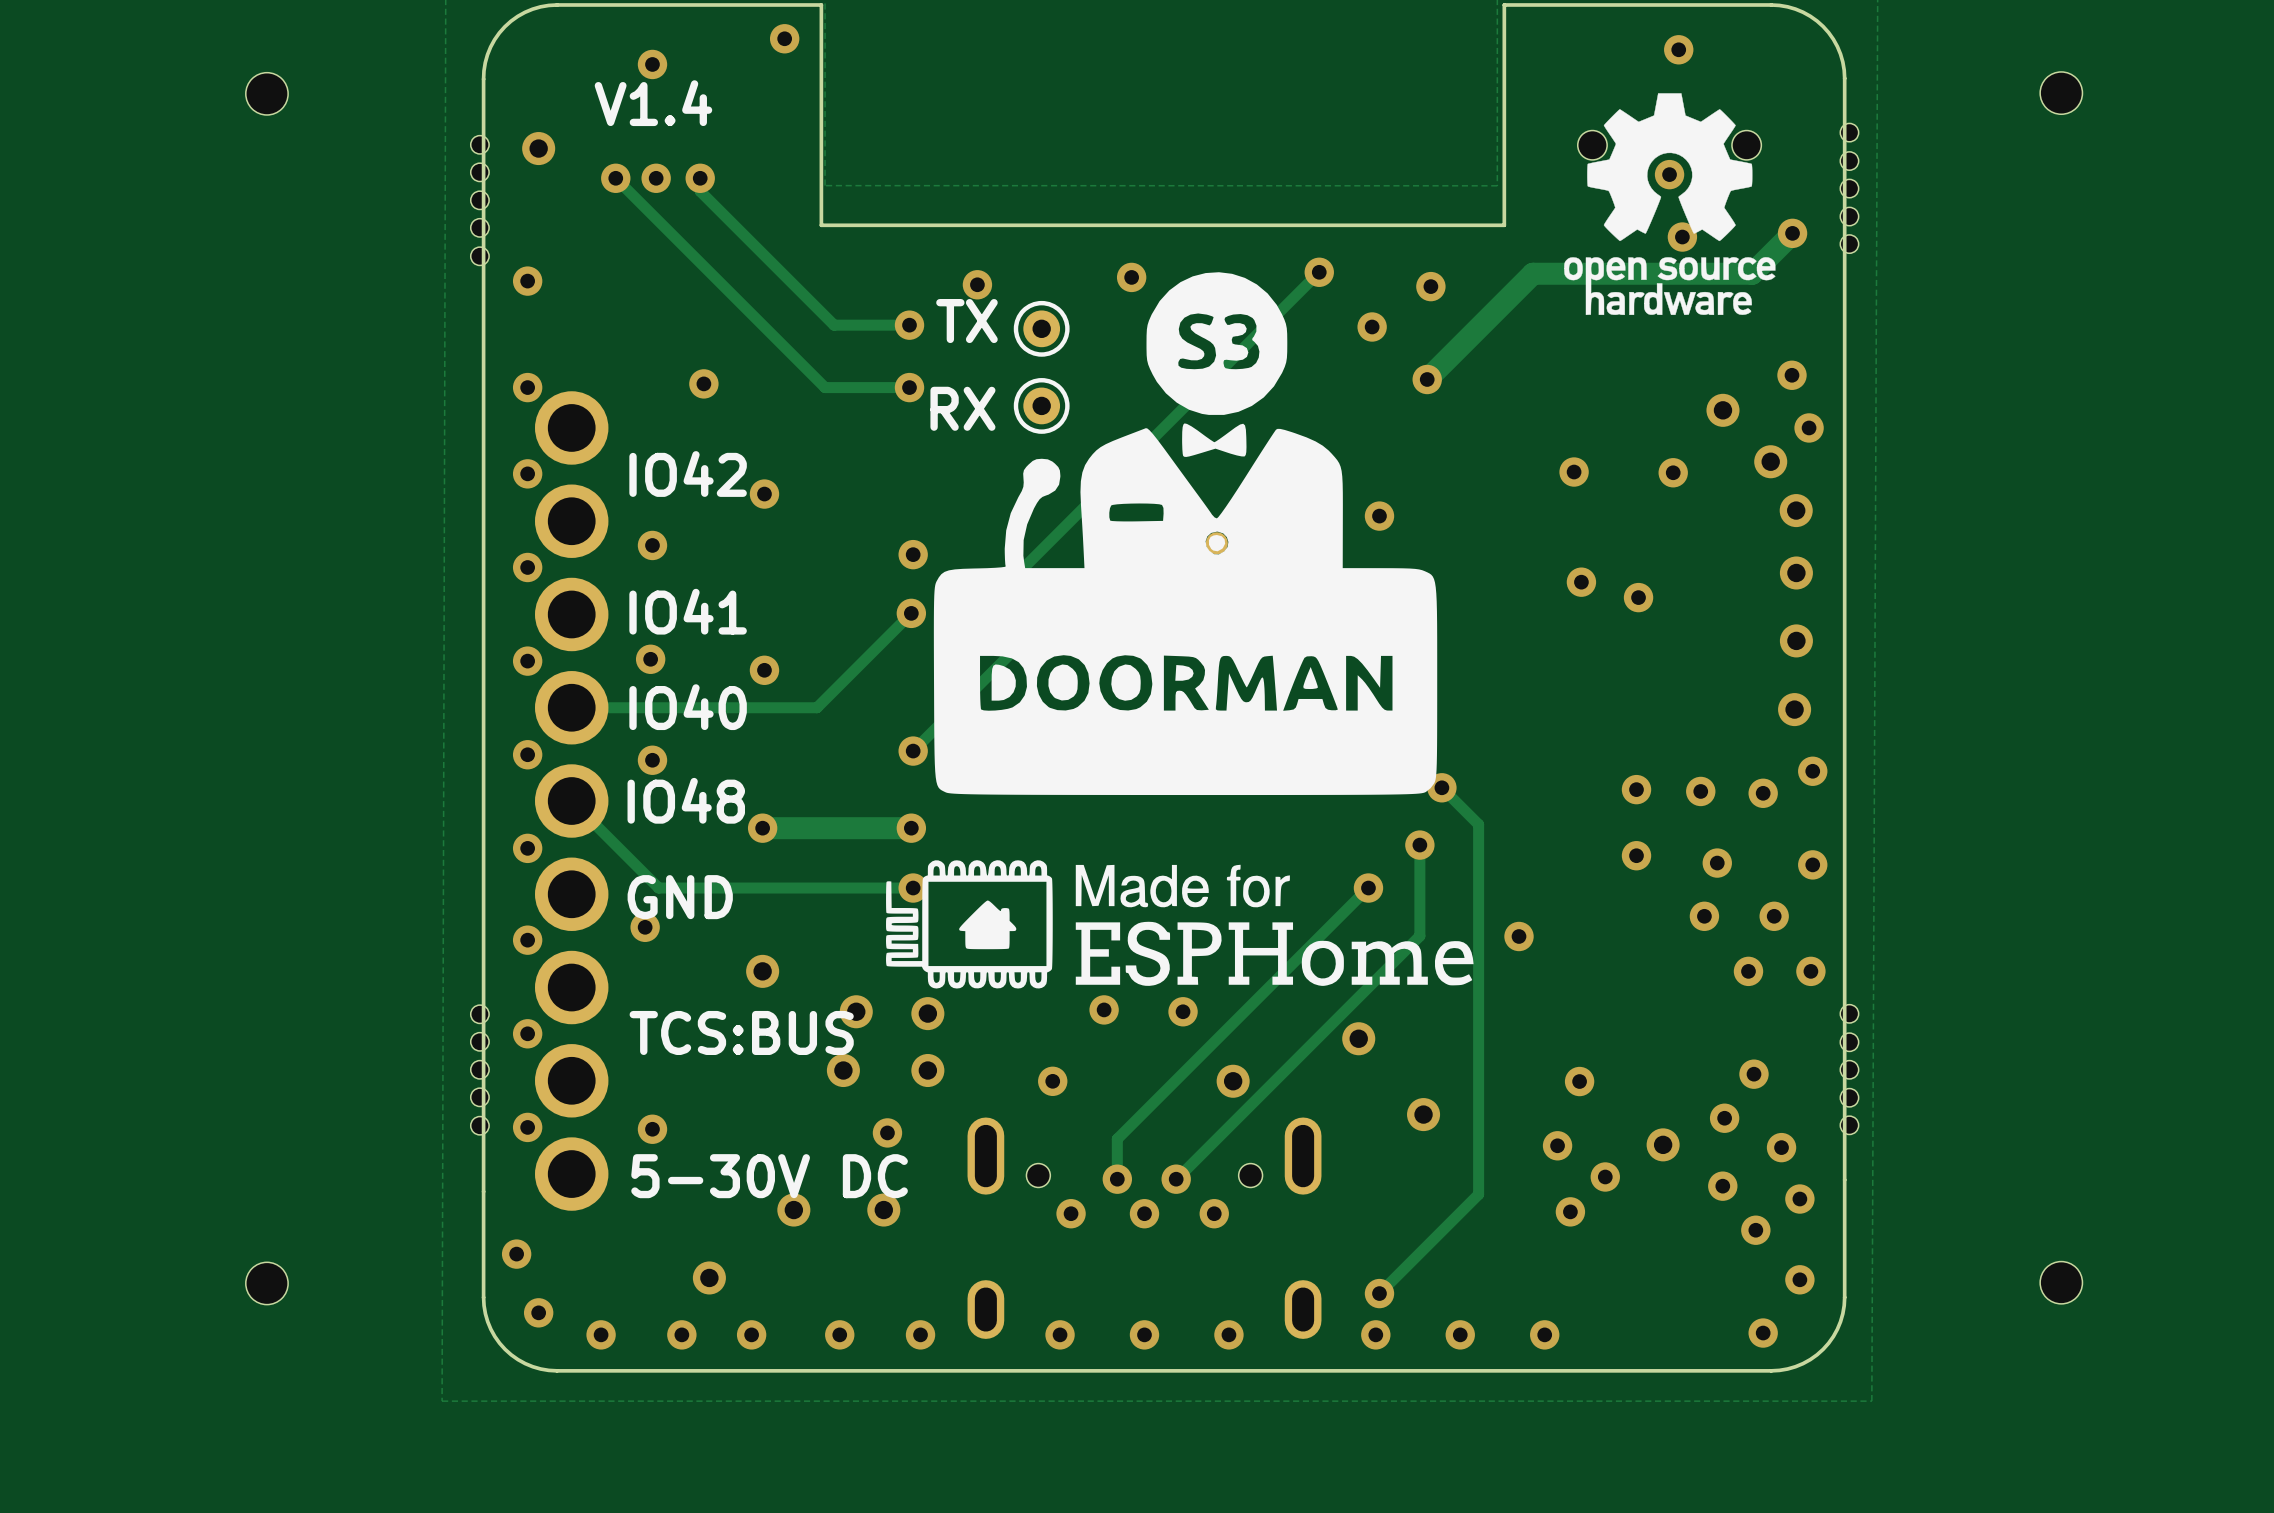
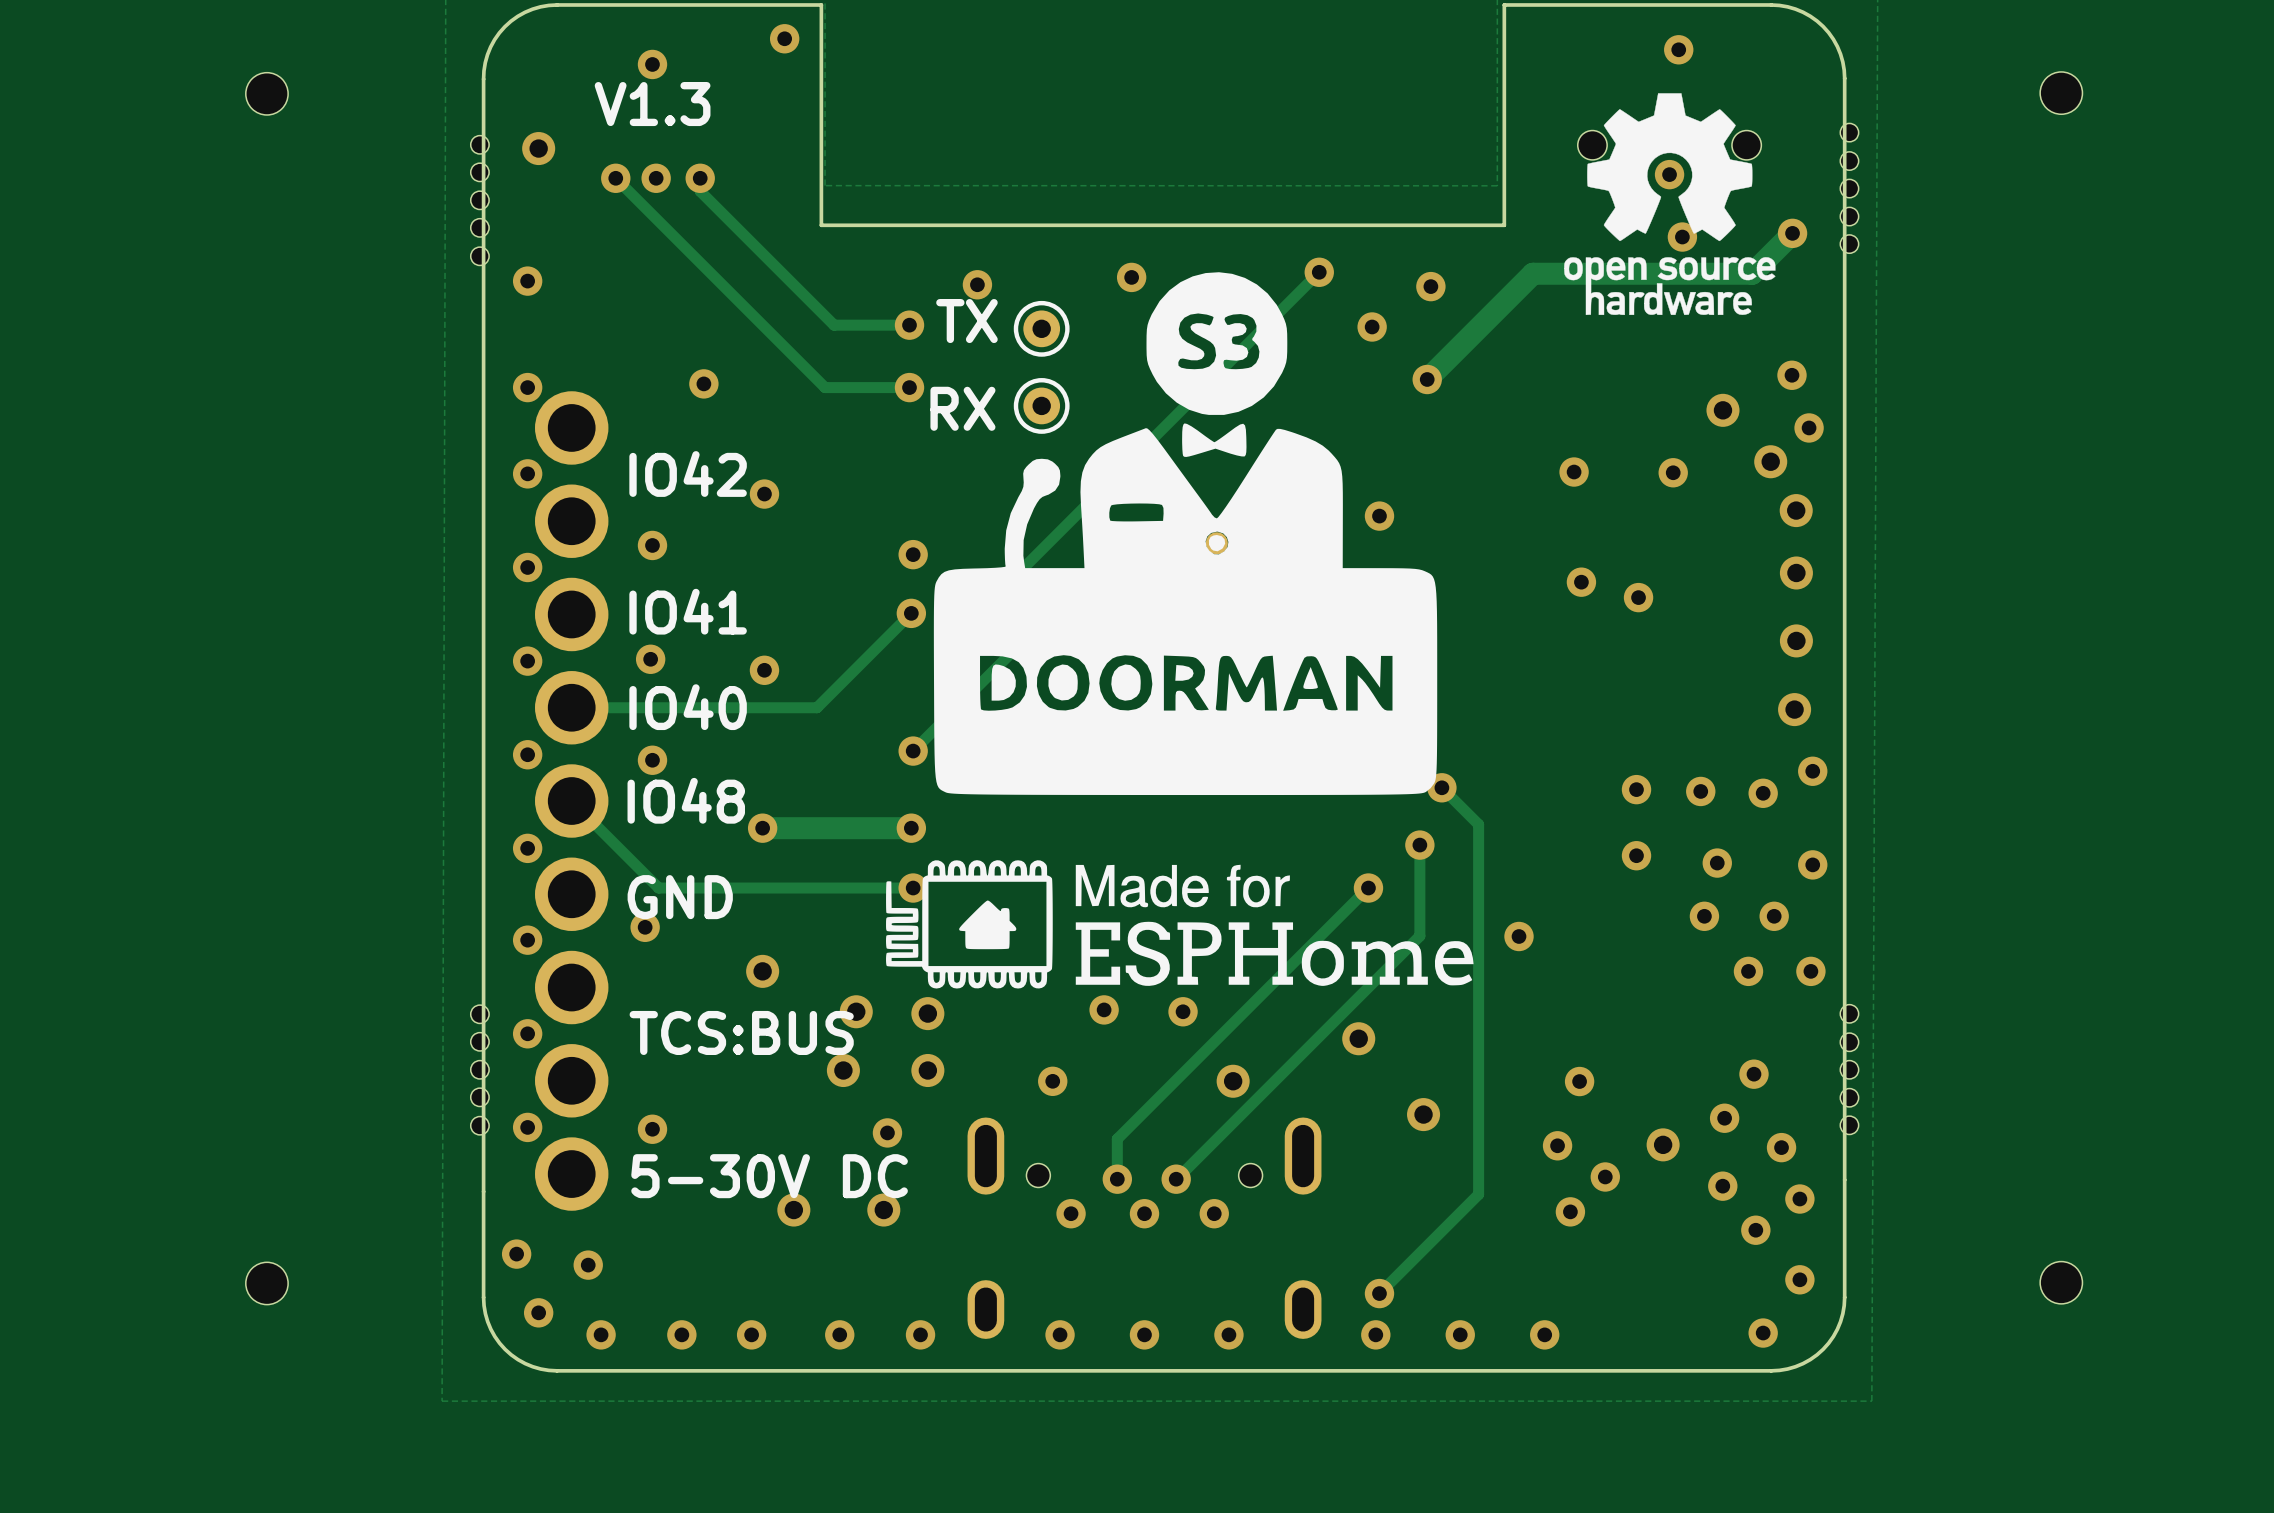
text: V1.4 (653, 103) -> V1.3 (652, 104)
via: none -> (588, 1265)
via: (709, 1277) -> none

